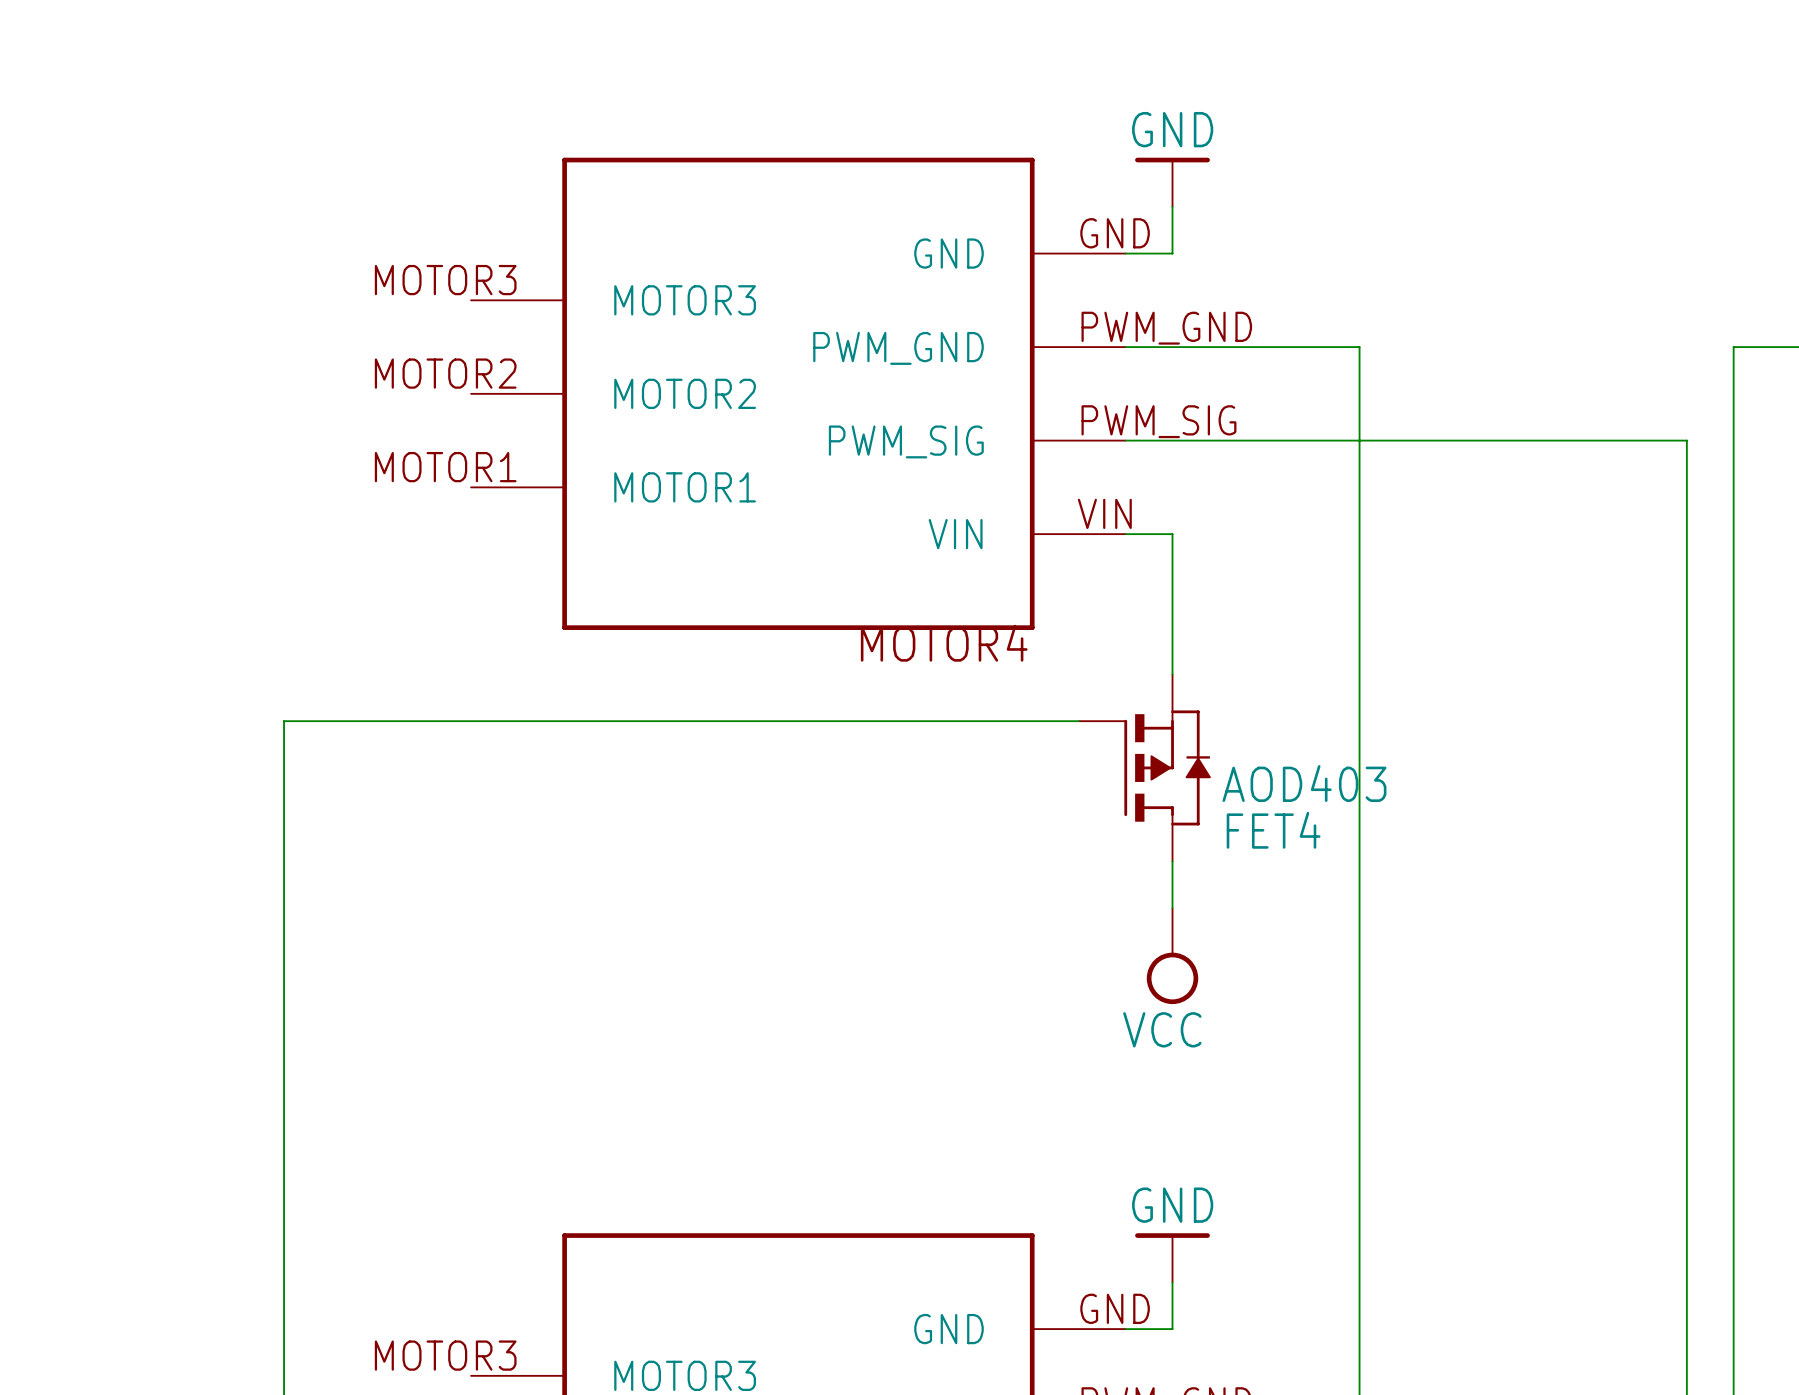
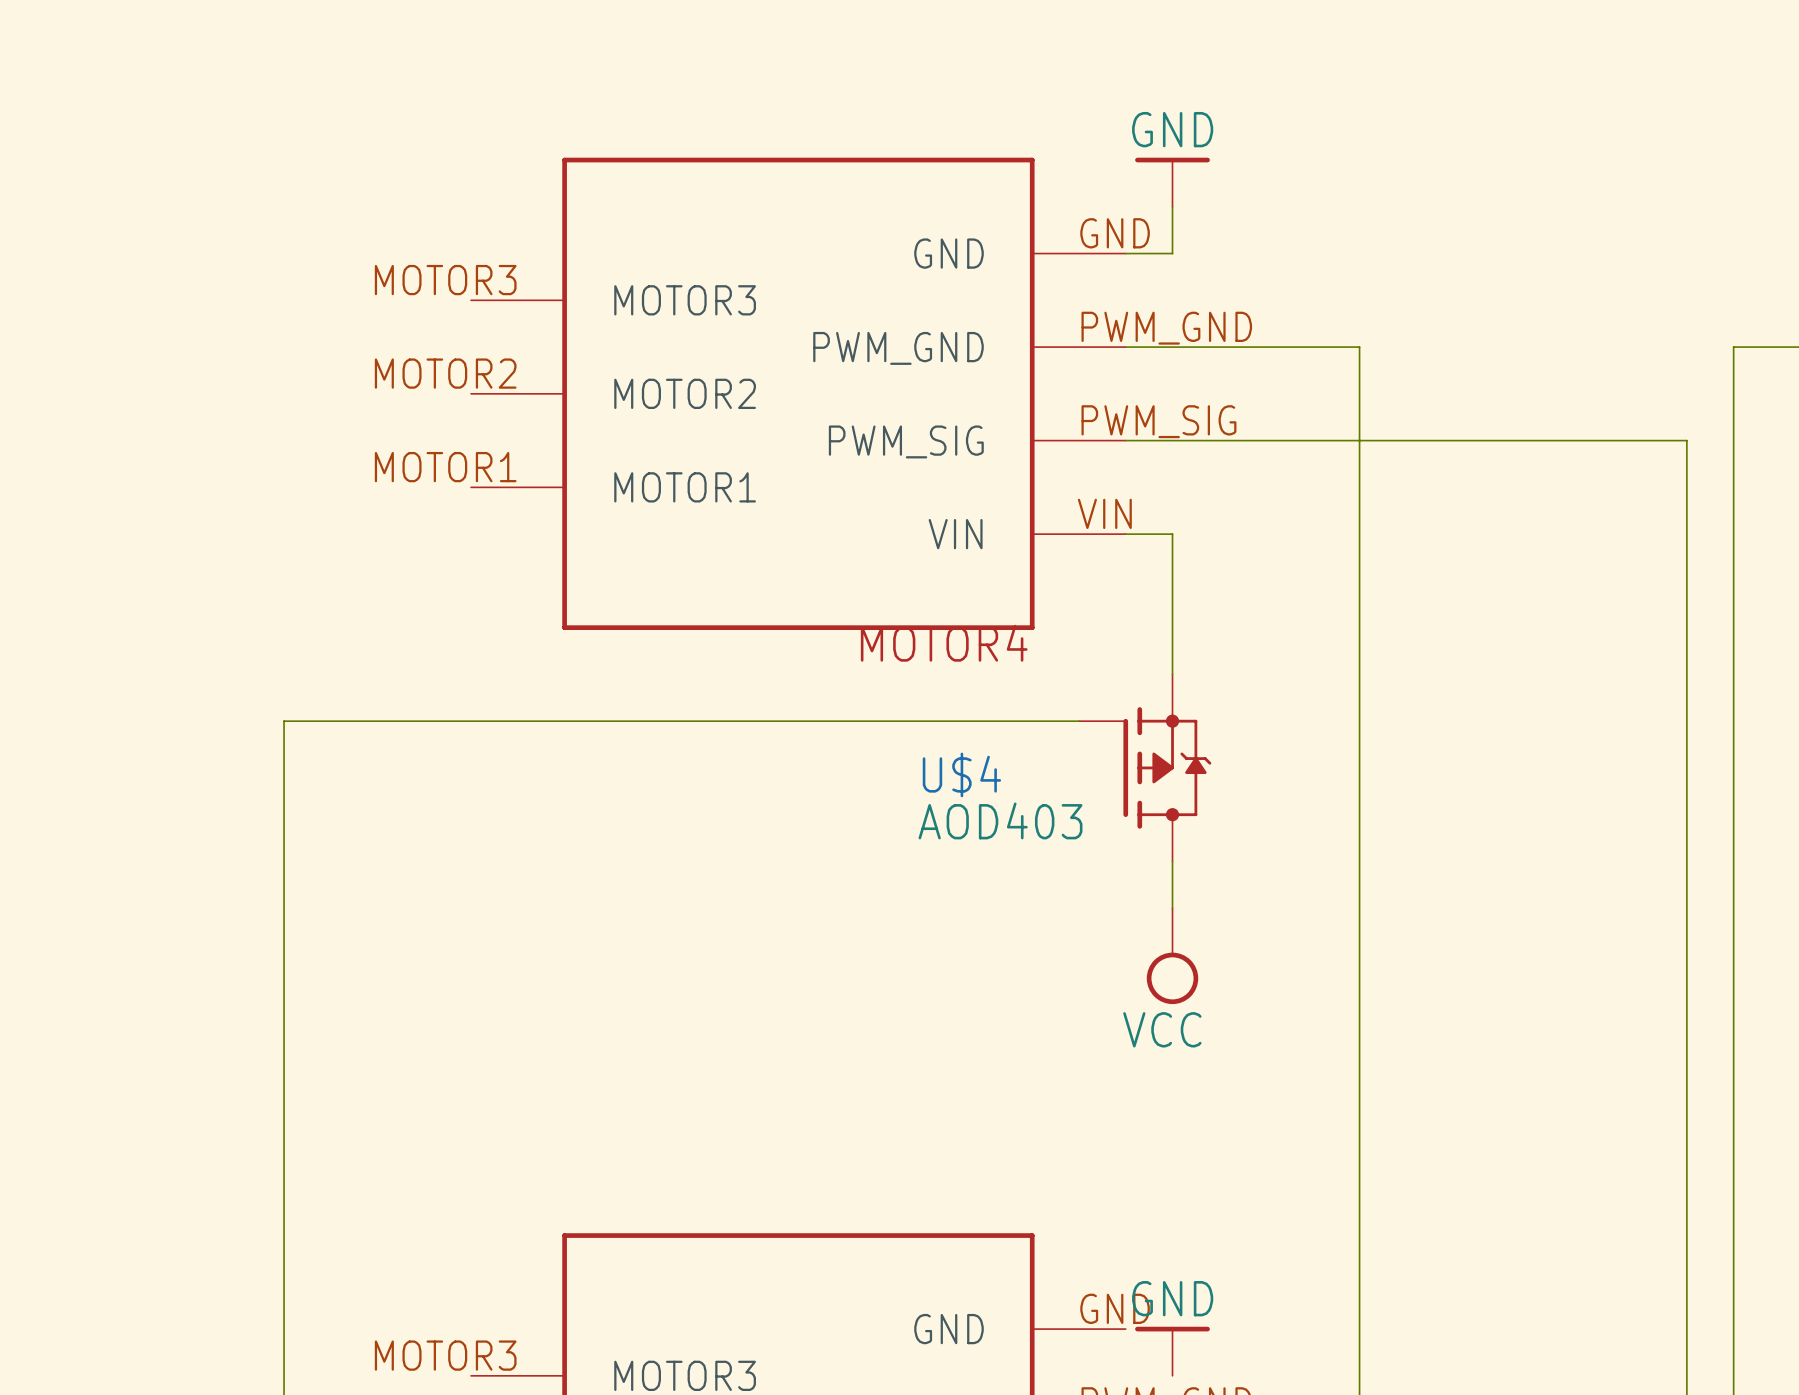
FET4: AOD403 (1144, 767) -> none
U$4: none -> AOD403 (1145, 767)
power symbol position: GND (1172, 1257) -> GND (1172, 1351)
wire: (1172, 1282) (1172, 1329) (1125, 1329) -> none

